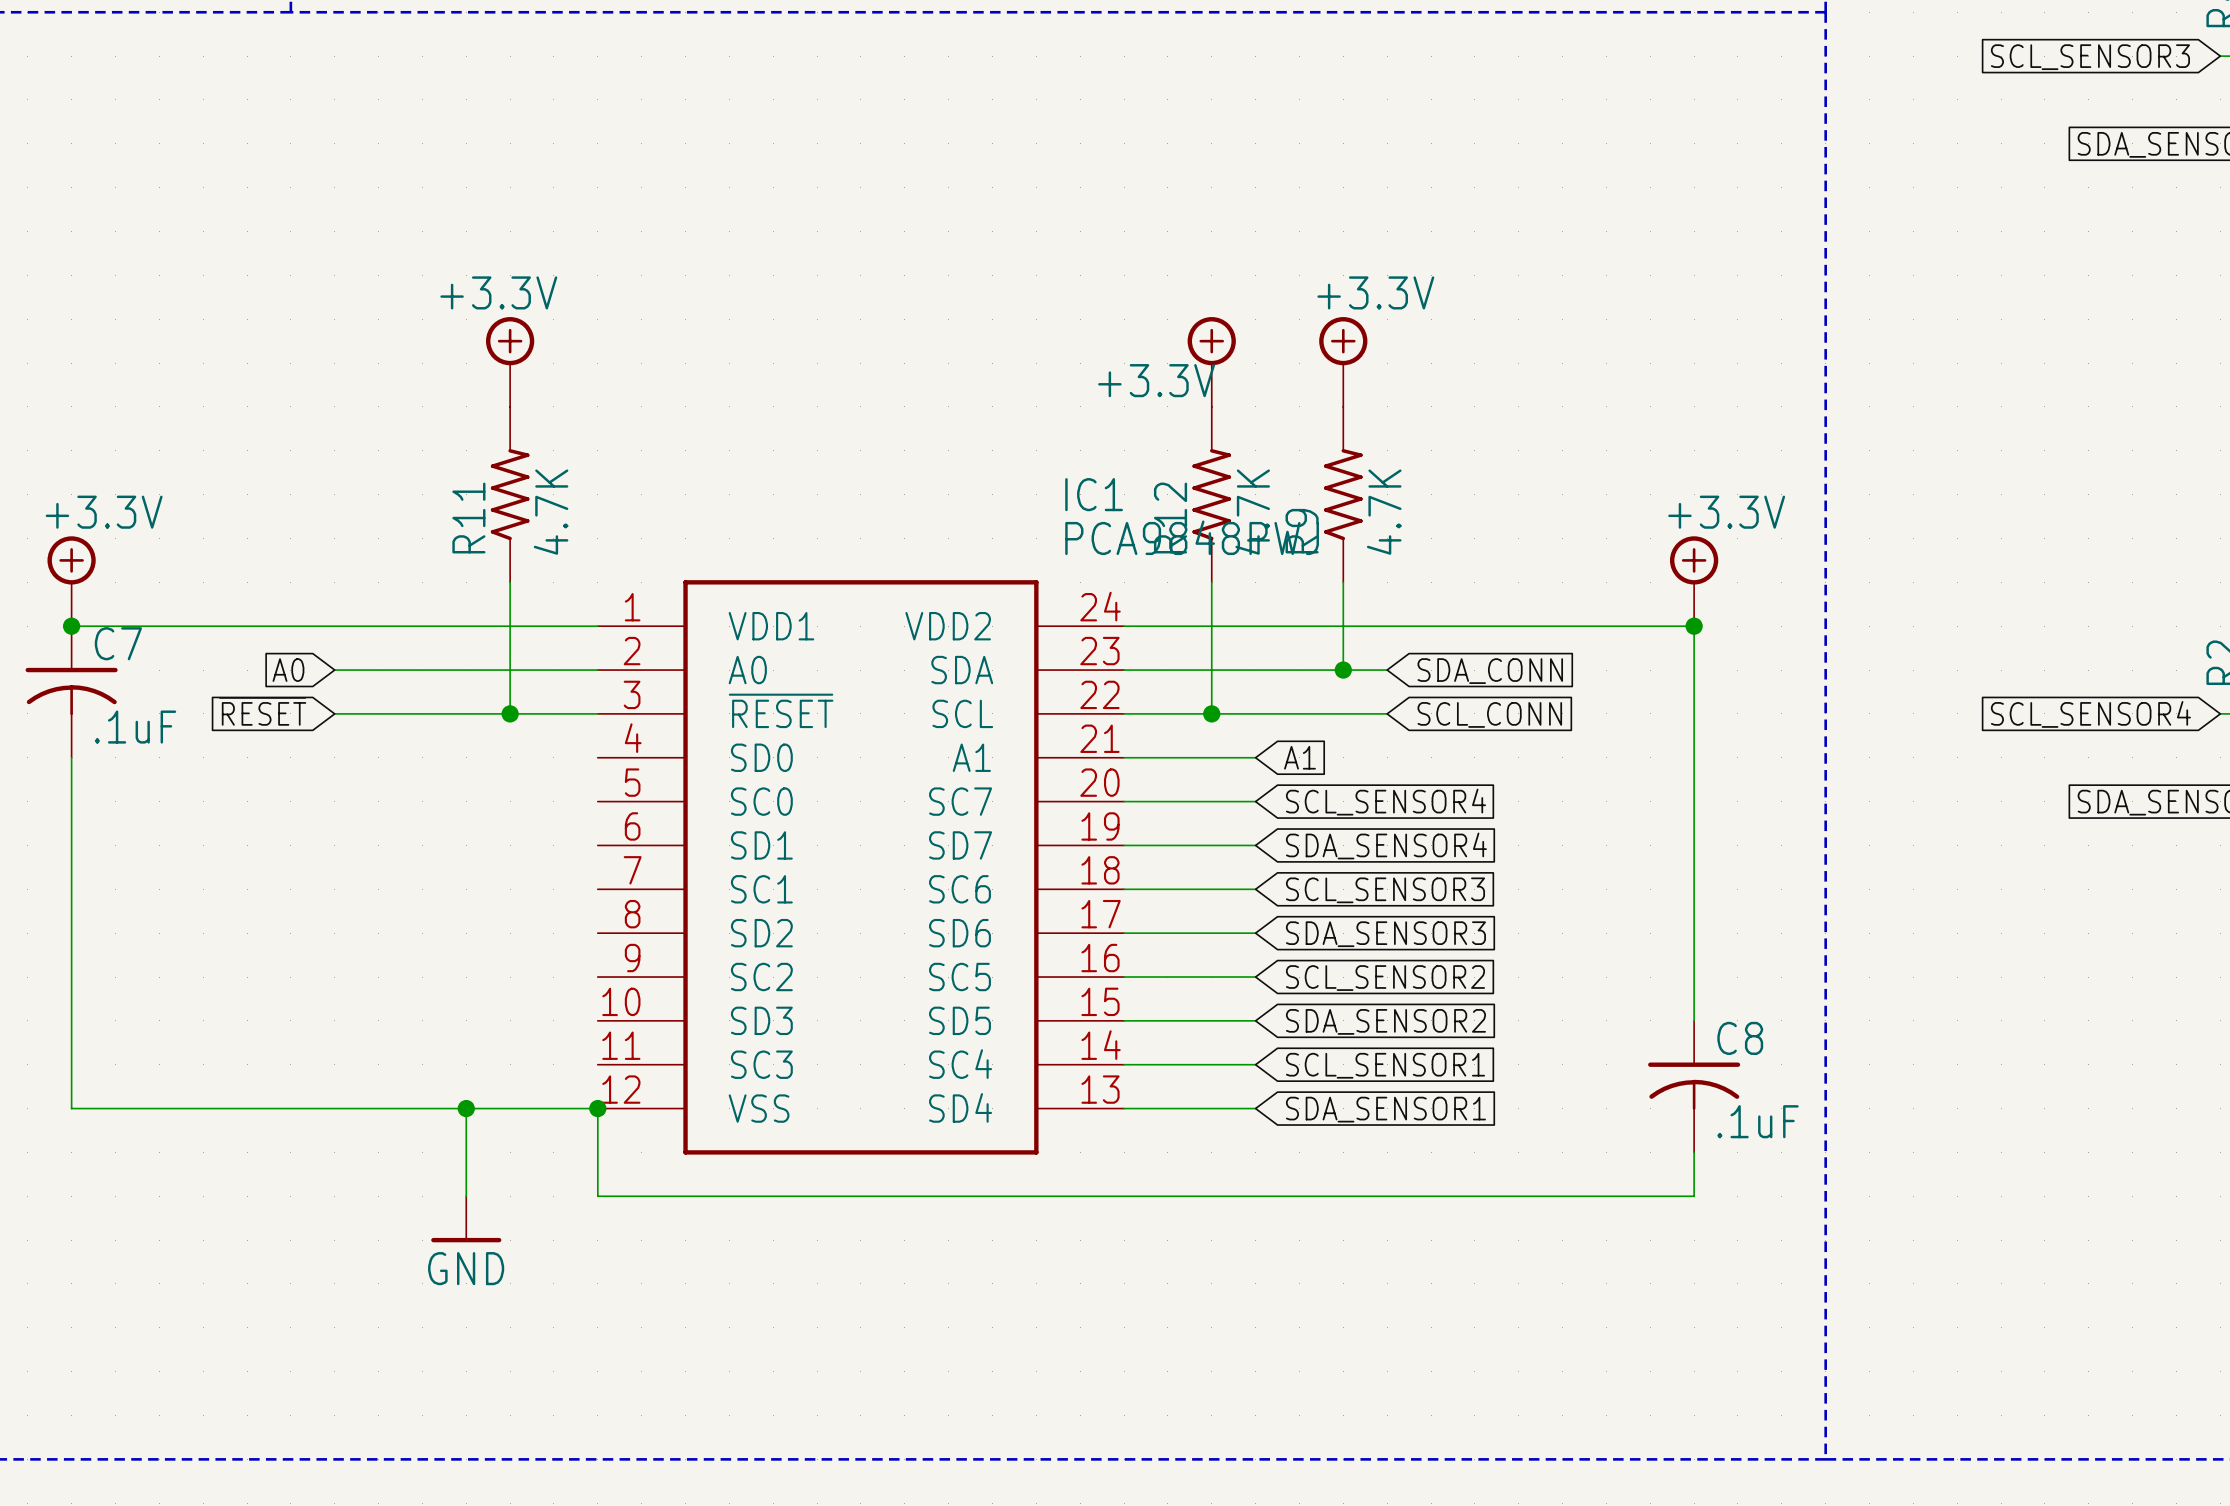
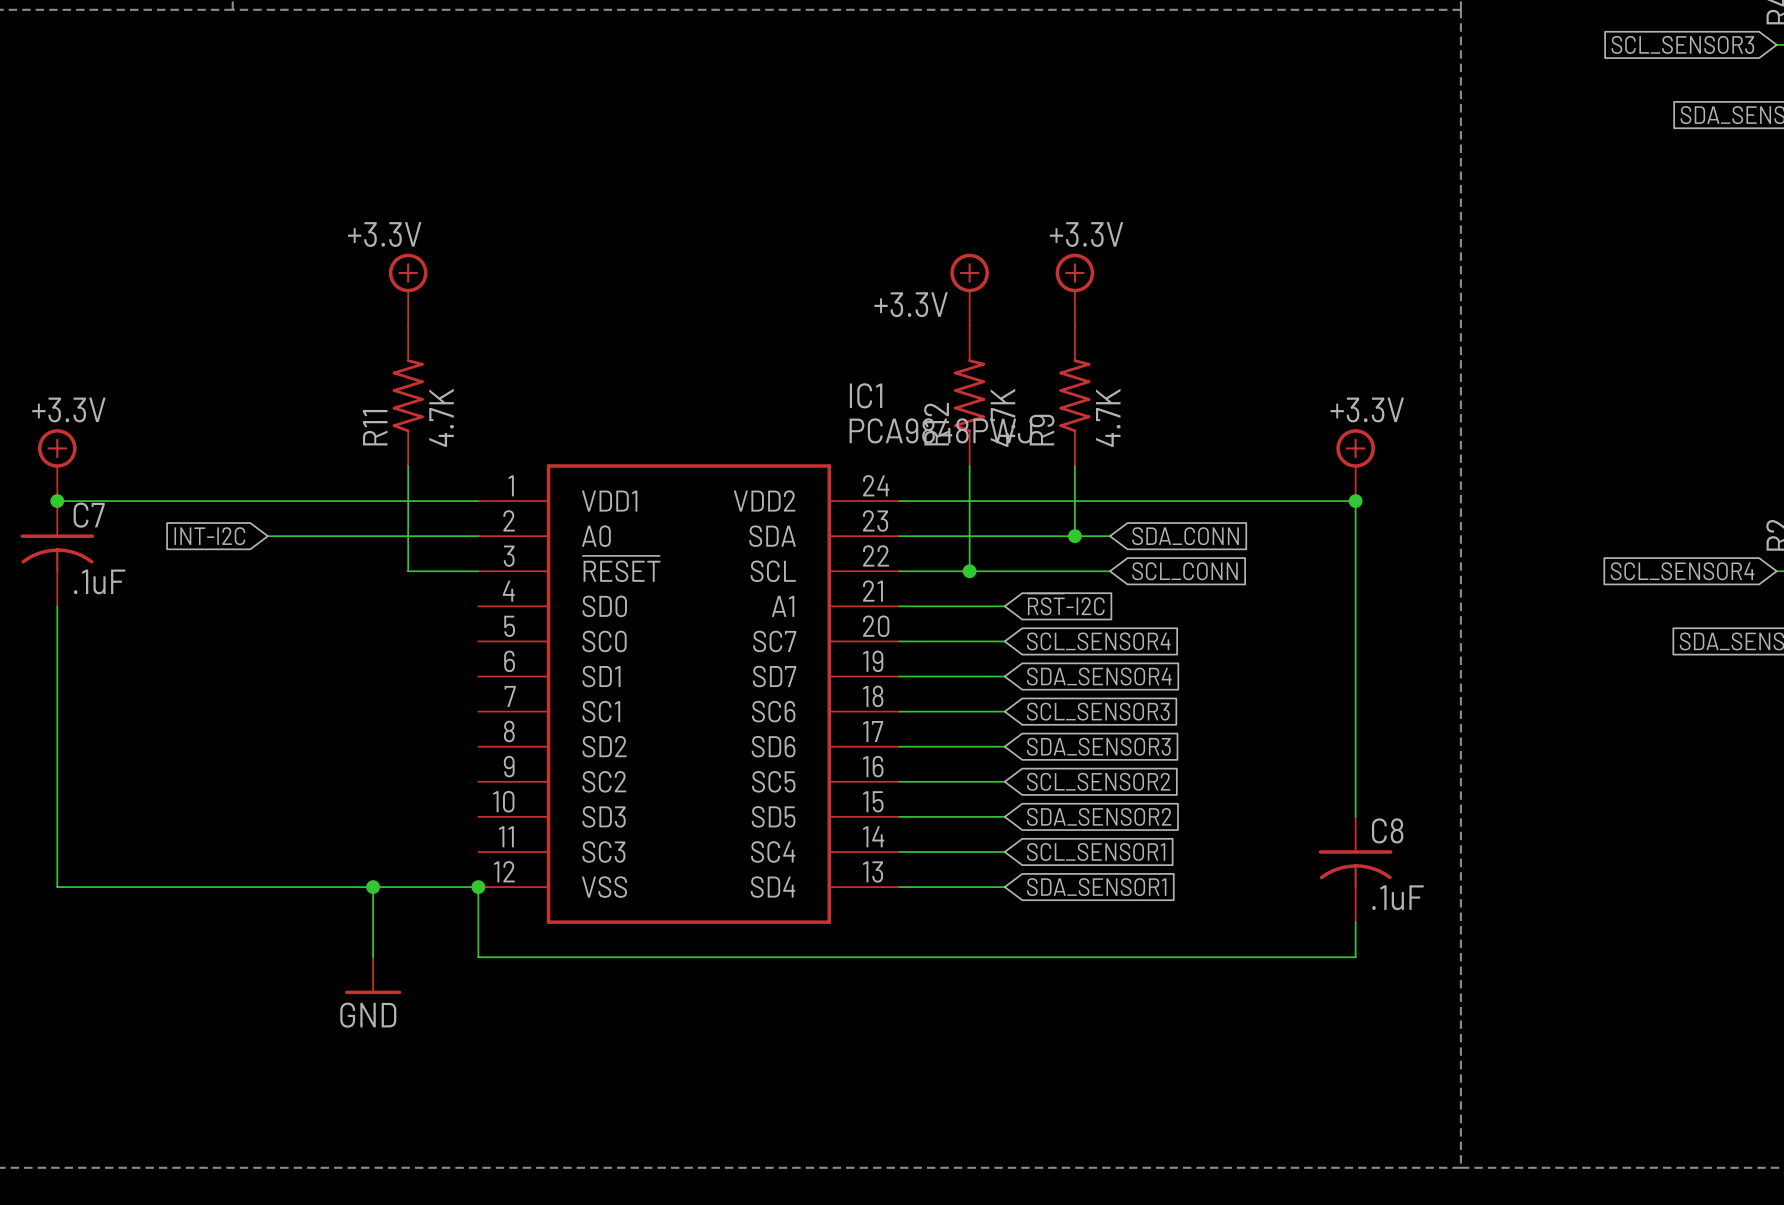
global label: A0 (288, 670) -> INT-I2C (209, 536)
global label: ~{RESET} (262, 711) -> none
wire: (334, 713) (510, 713) -> none
junction: (510, 713) -> none
global label: A1 (1299, 757) -> ~{RST}-I2C (1066, 604)

